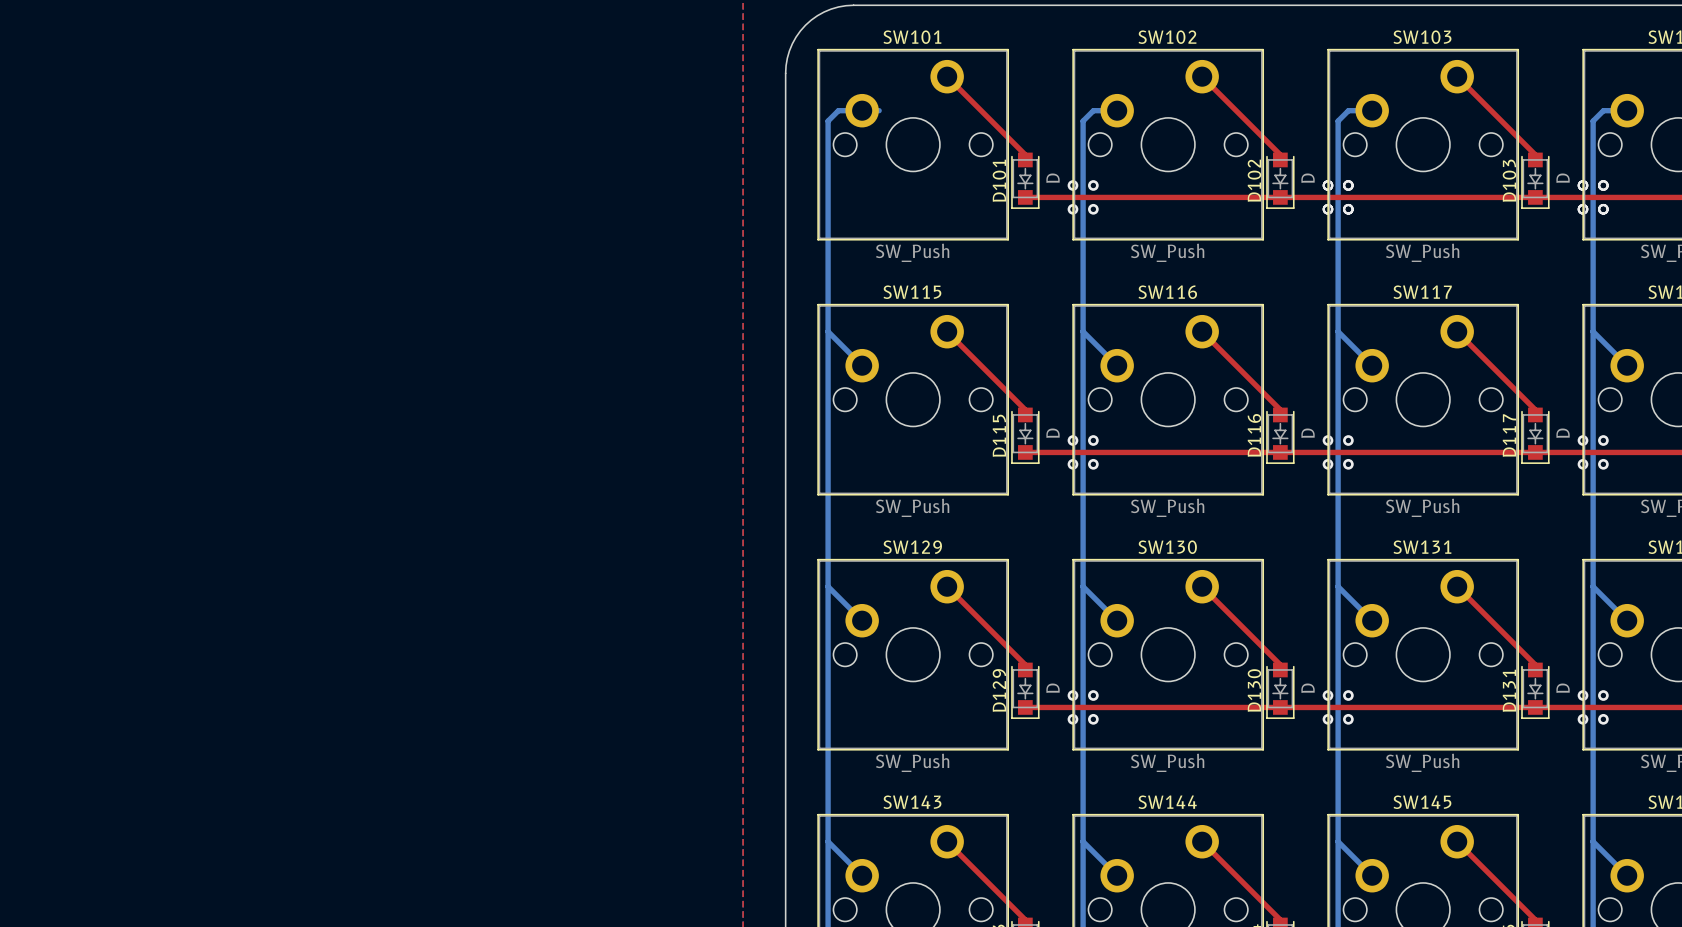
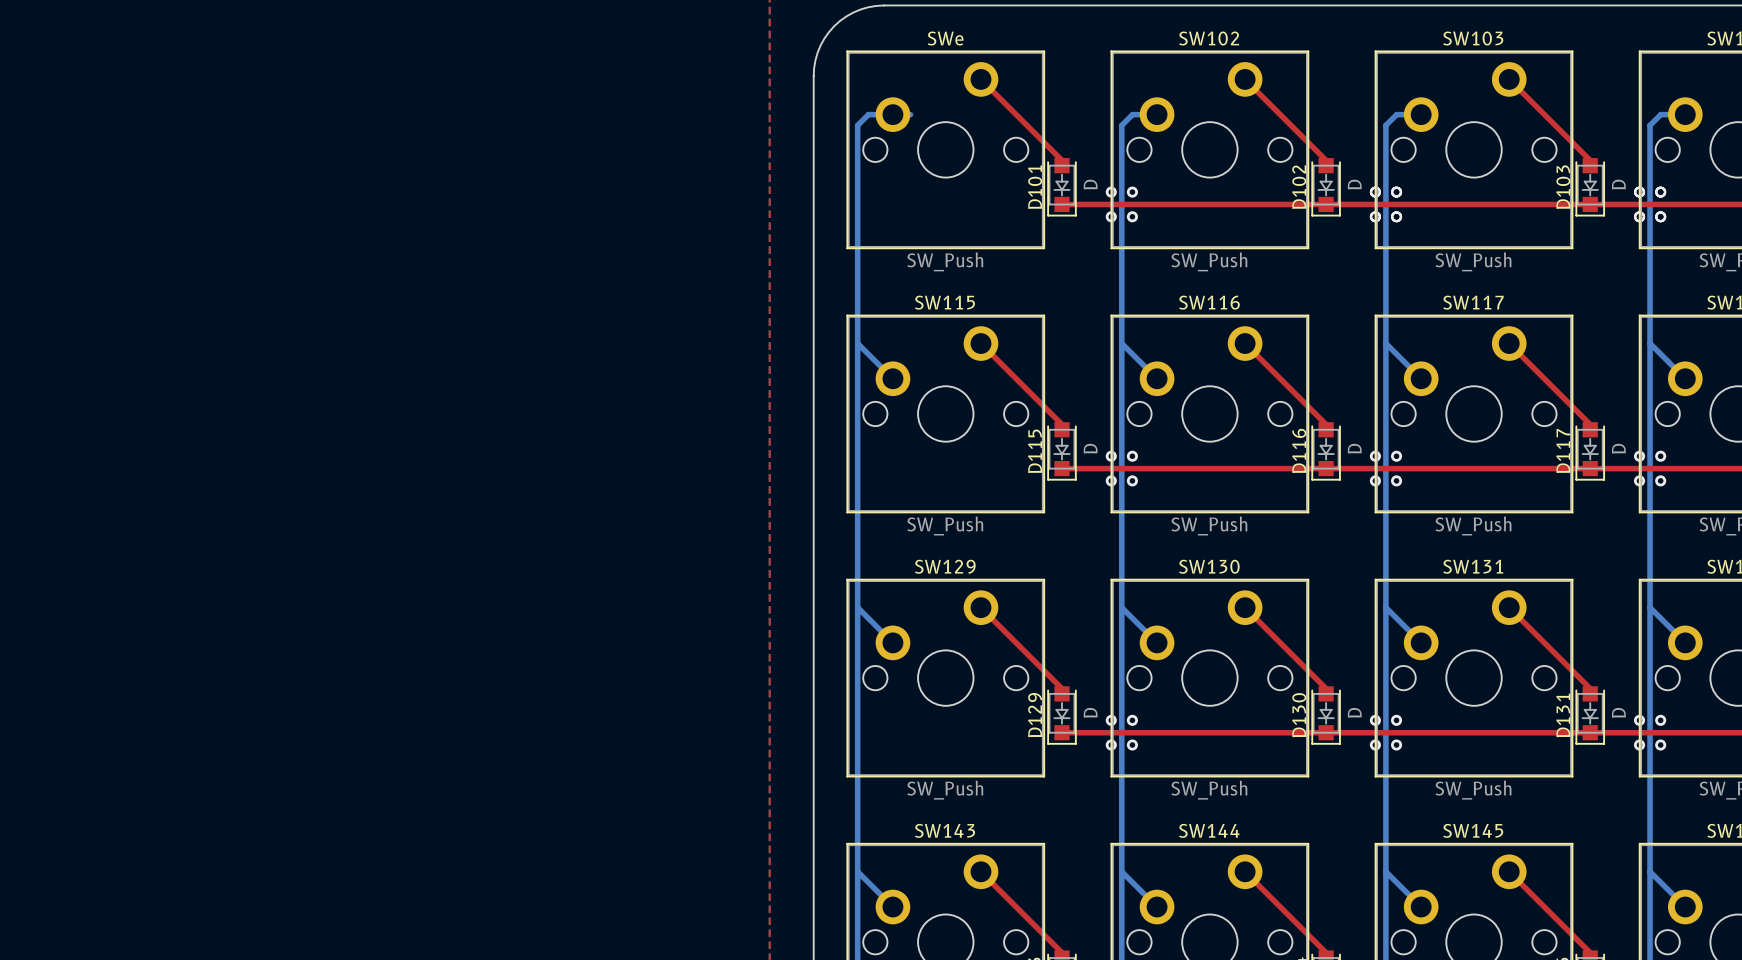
SW101 name: SW101 (912, 37) -> SWe (945, 38)

